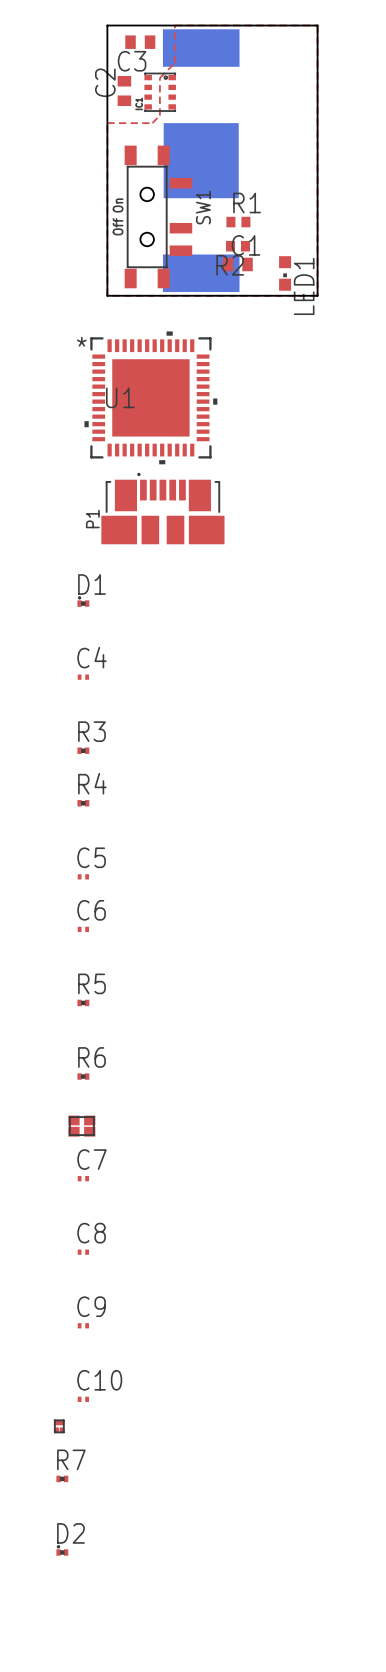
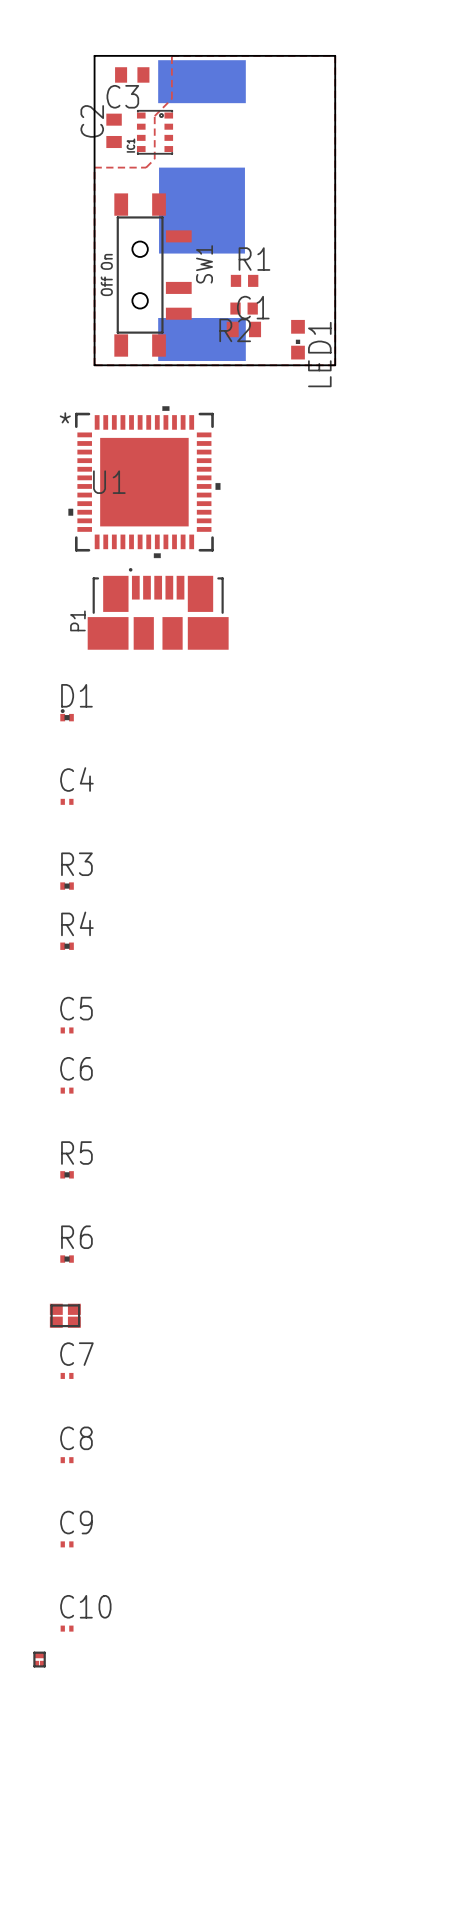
R7: (62, 1478) -> none
D2: (62, 1550) -> none

